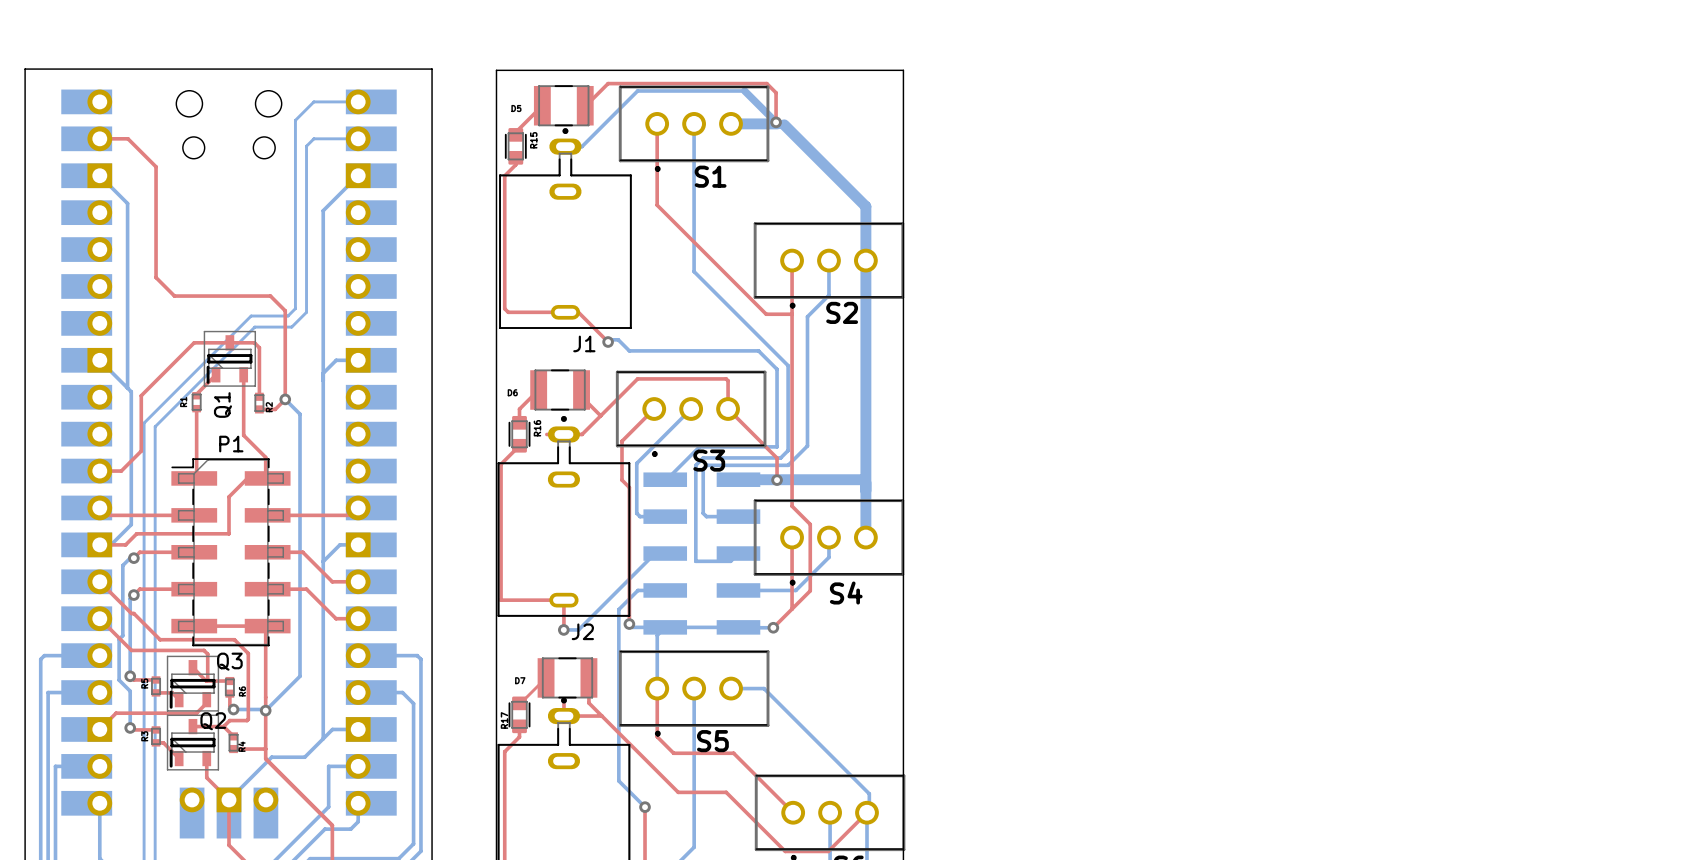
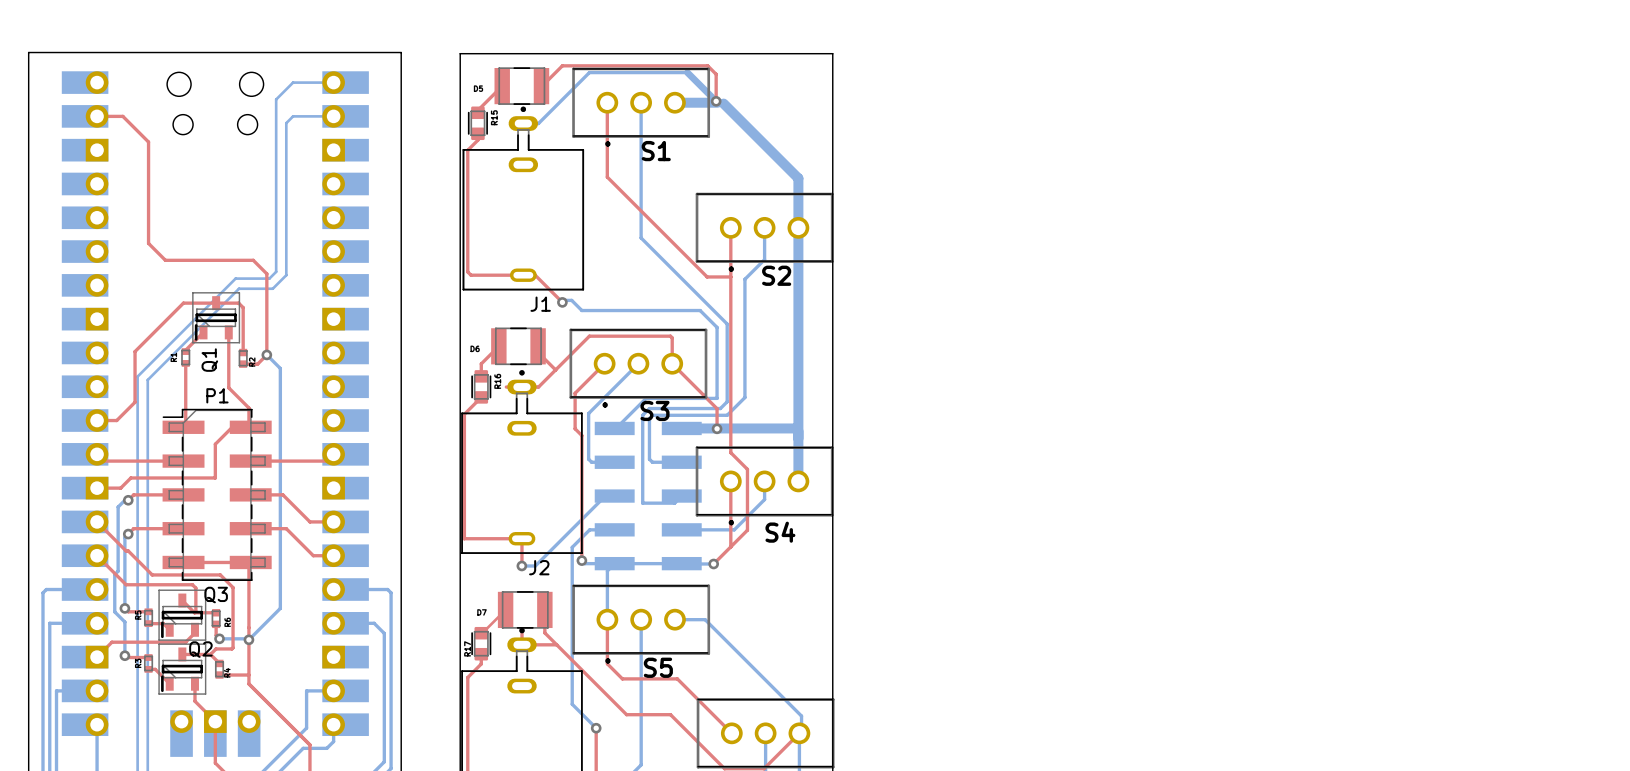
bottom track: (99, 175) (127, 203) (127, 388) -> none
bottom track: (358, 175) (323, 210) (323, 738) -> none
bottom track: (99, 360) (131, 391) (131, 524) (111, 544) (99, 544) -> none
bottom track: (358, 360) (336, 360) (323, 373) -> none
bottom track: (358, 544) (339, 544) (323, 561) -> none
bottom track: (358, 729) (332, 729) (304, 757) (271, 757) (229, 799) -> none

